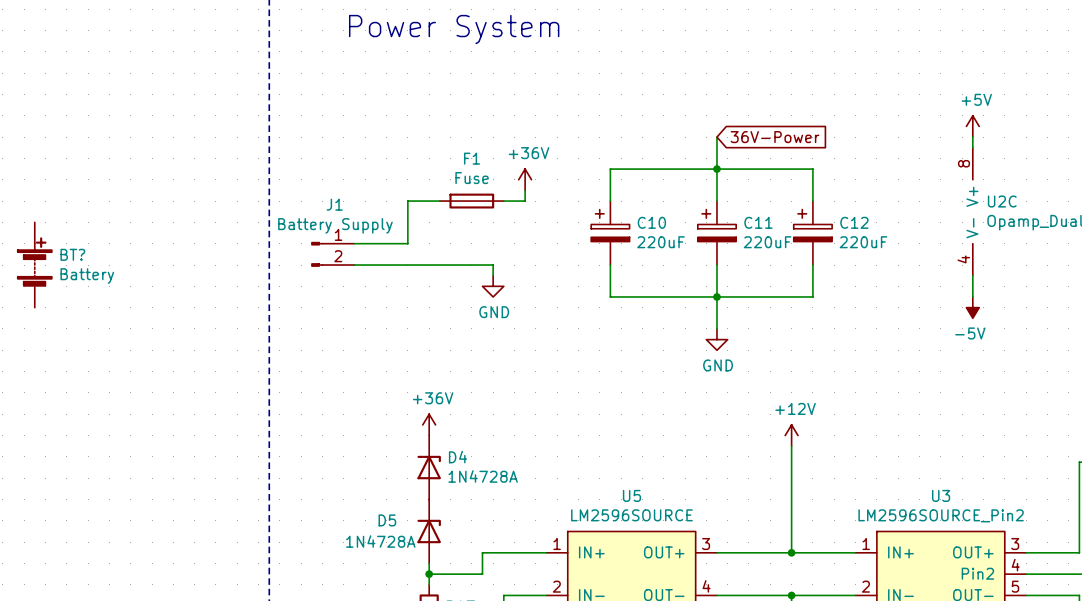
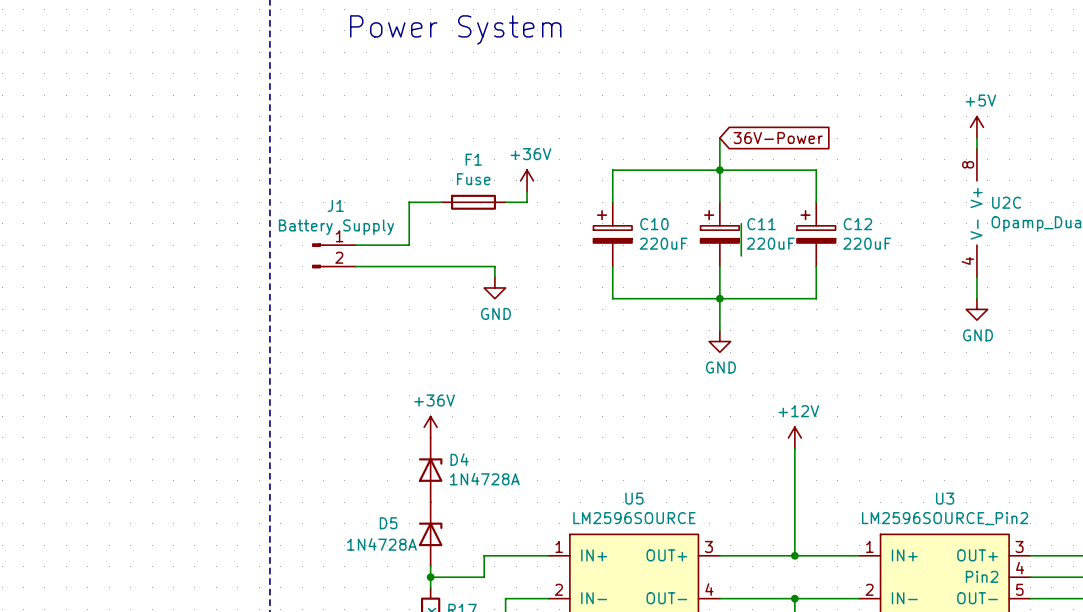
wire: none -> (741, 223) (741, 255)
BT?: Battery (34, 265) -> none
power symbol: -5V (972, 307) -> GND (976, 309)

